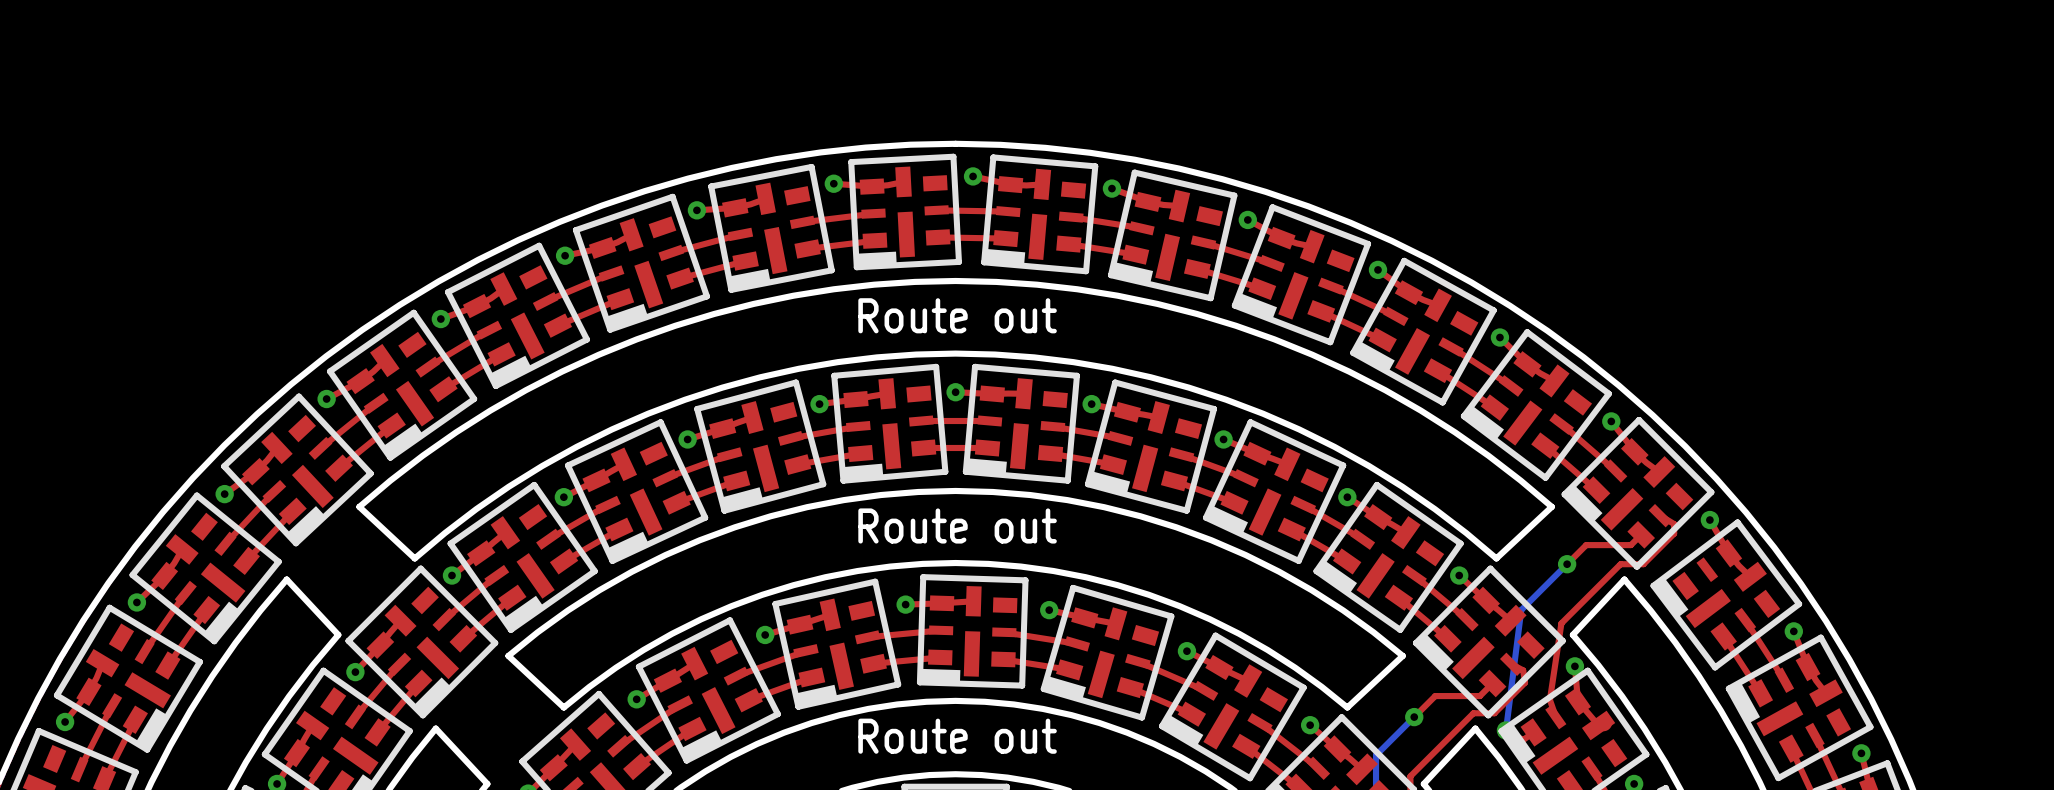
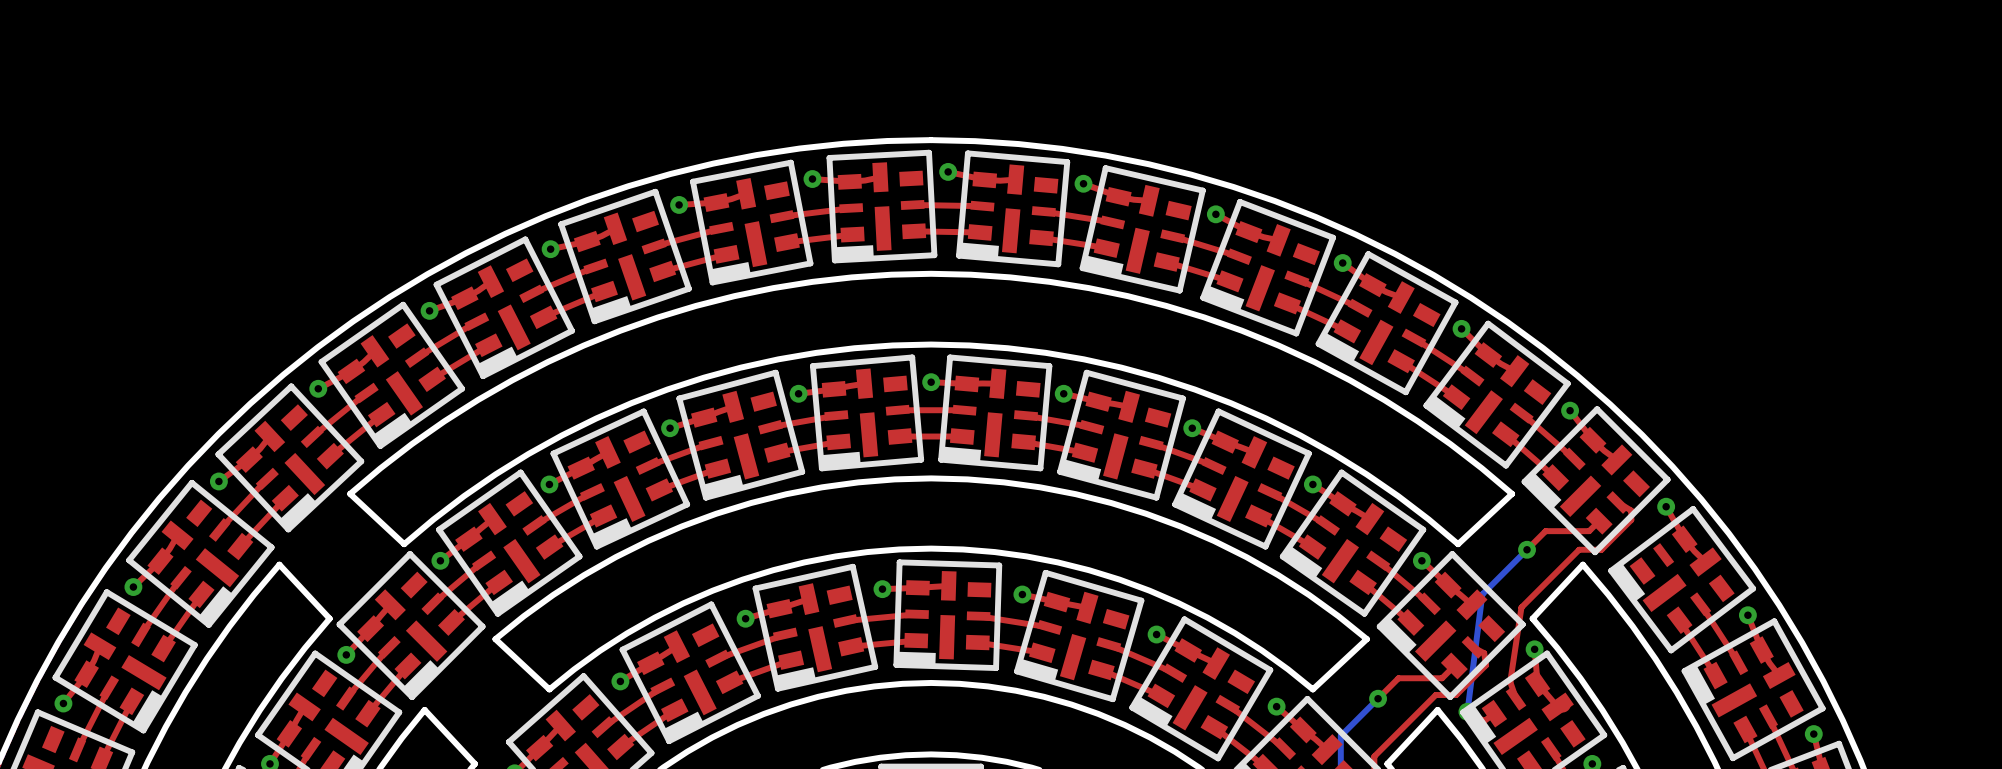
text: Route out (957, 315) -> none
text: Route out (957, 525) -> none
text: Route out (957, 736) -> none

